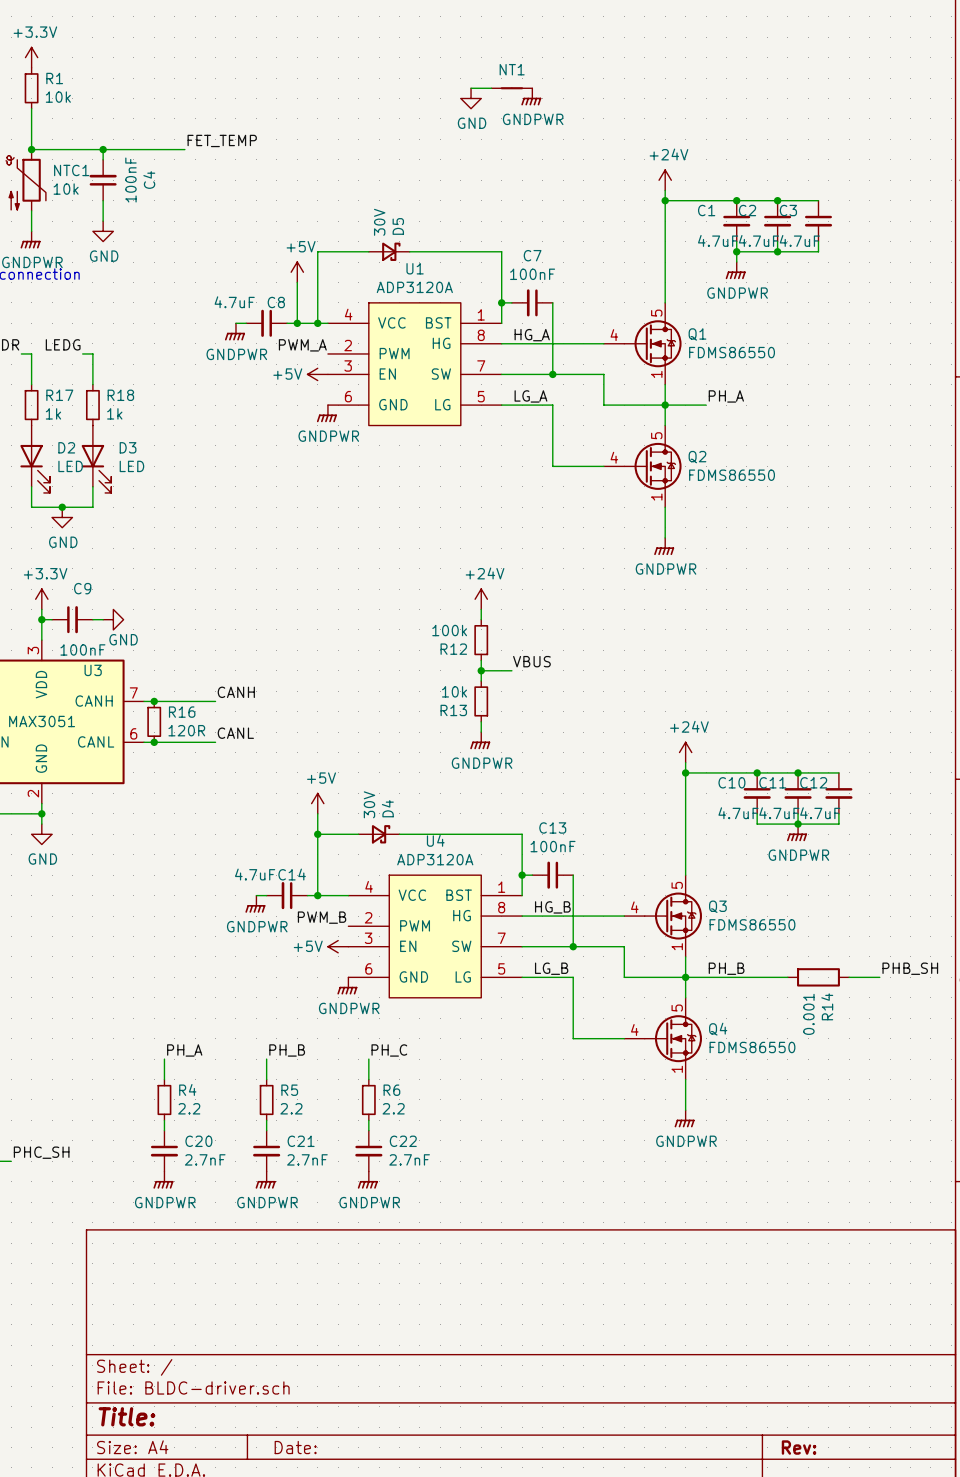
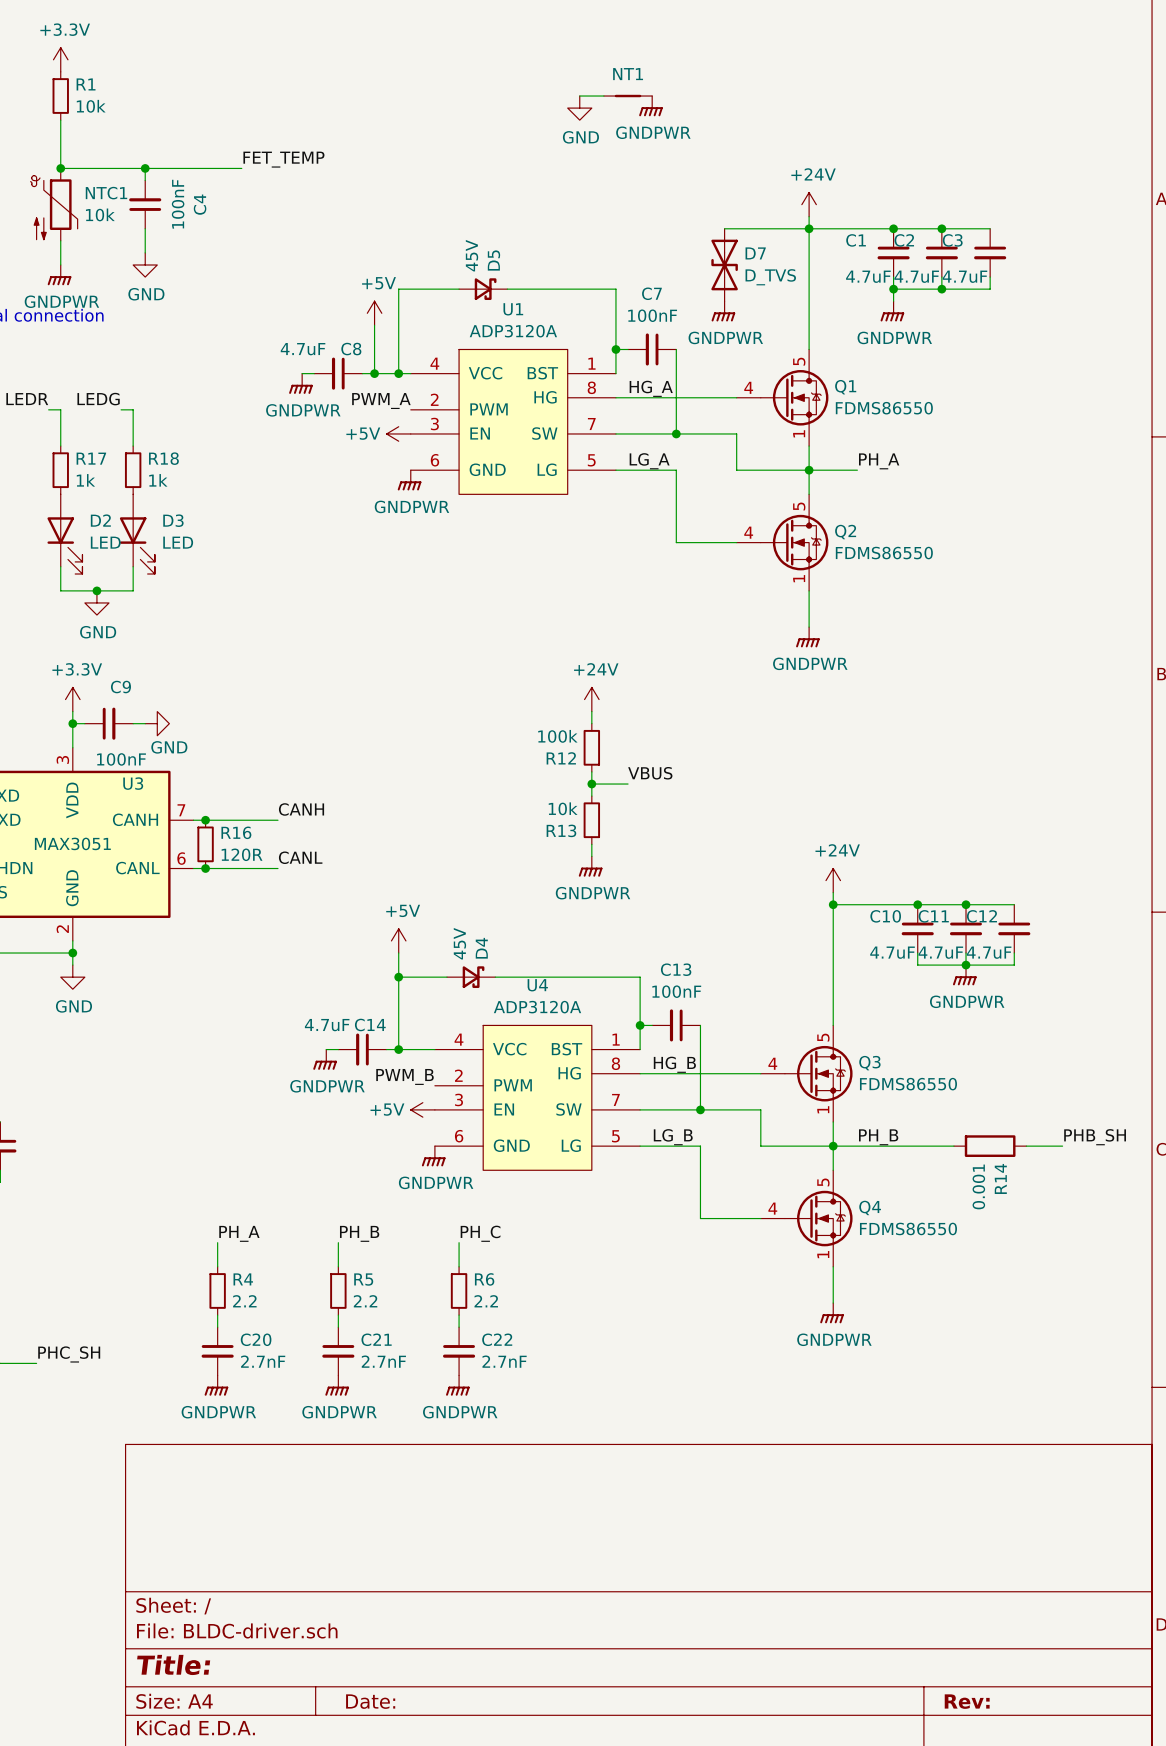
wire: none -> (724, 228) (809, 228)
D5 value: 30V (379, 222) -> 45V (472, 255)
D7: none -> D_TVS (724, 265)
power symbol: none -> GNDPWR (723, 311)
D4 value: 30V (369, 804) -> 45V (459, 943)

